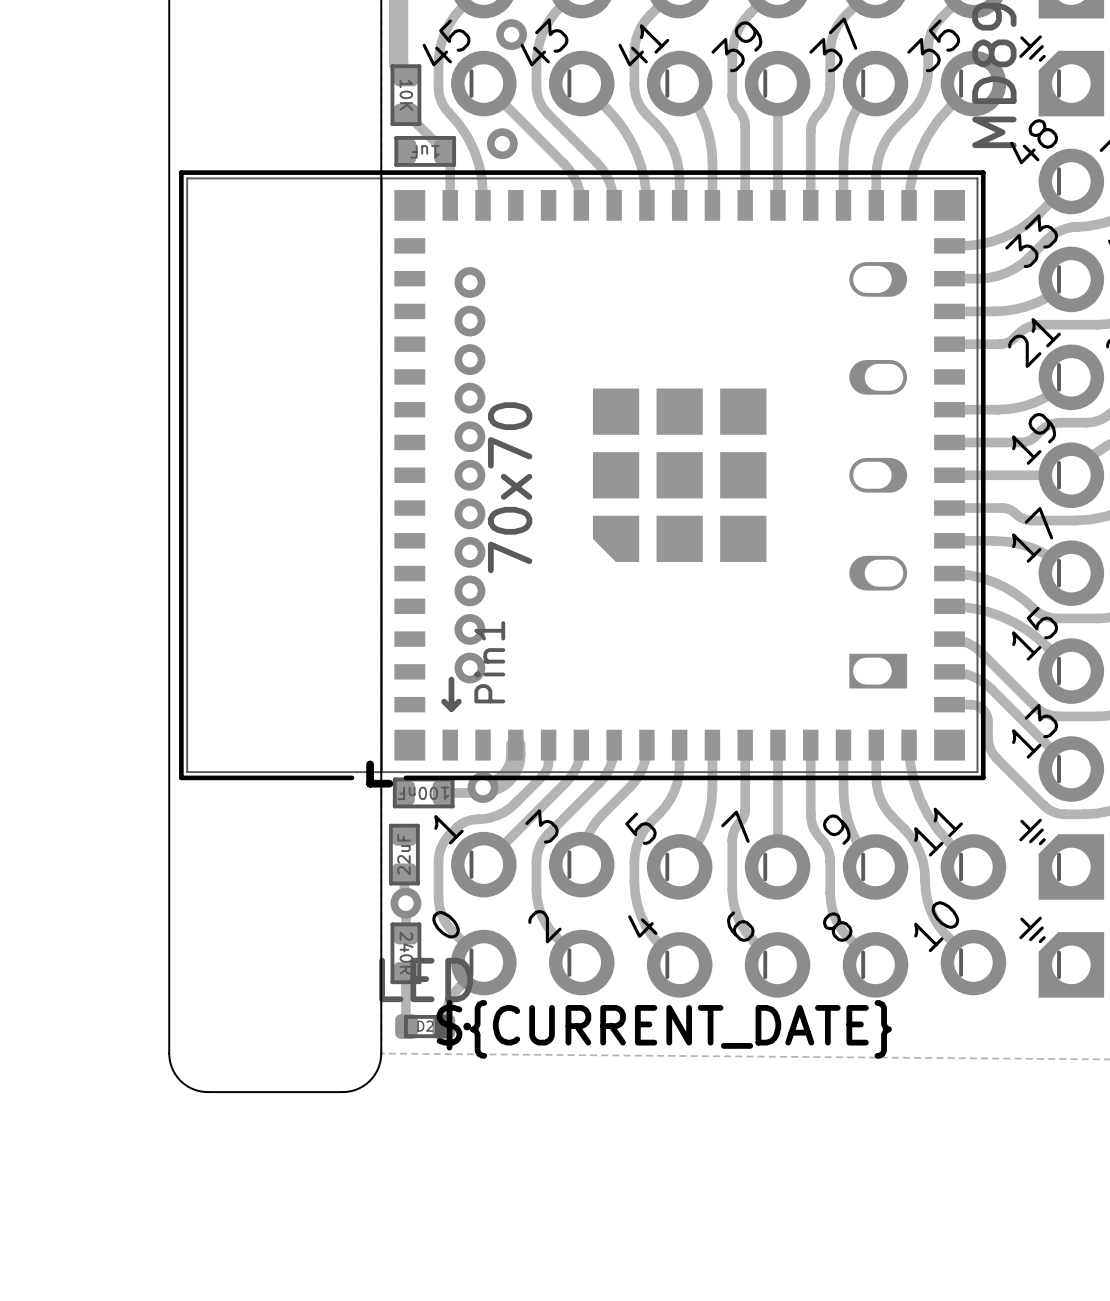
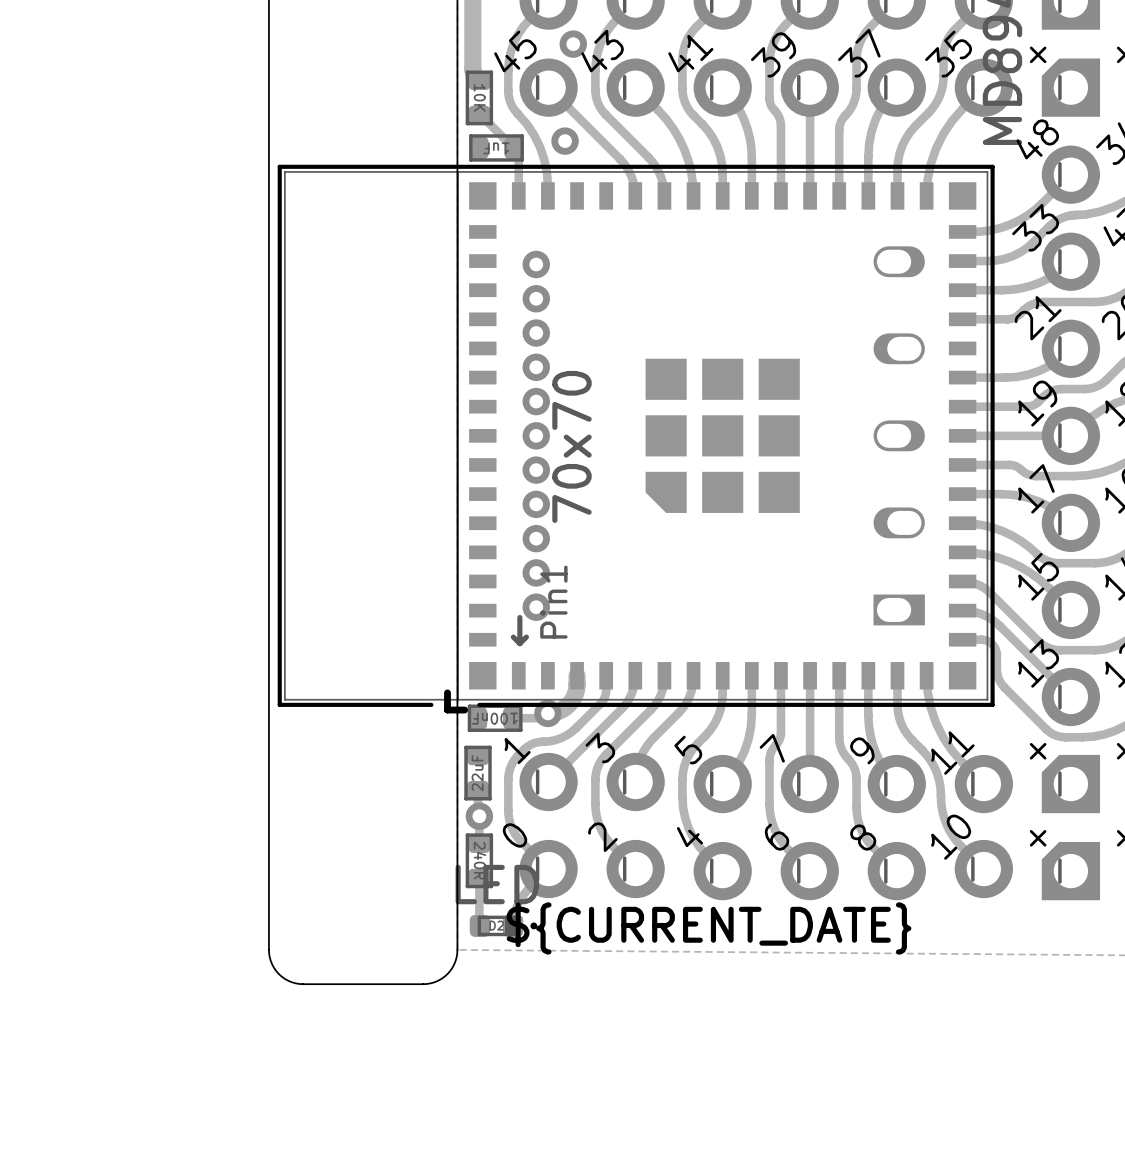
part value: ⏚ (1032, 48) -> + (1038, 54)
part value: ⏚ (1032, 831) -> + (1038, 751)
part value: ⏚ (1032, 929) -> + (1038, 838)

